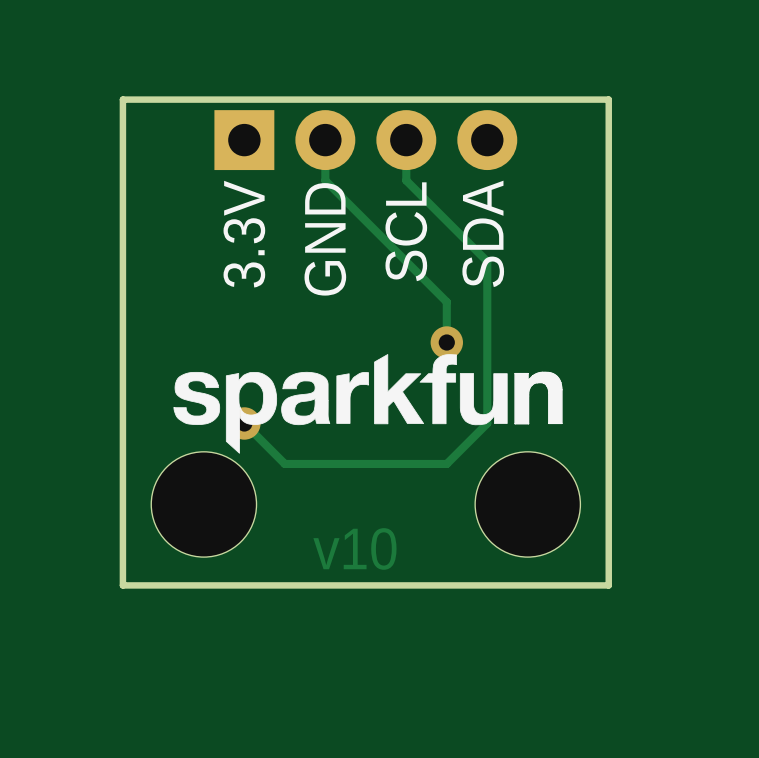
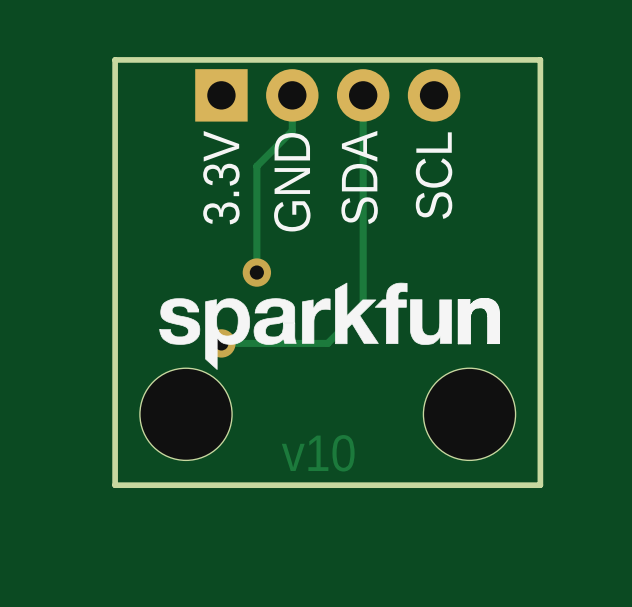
track: (325, 180) (446, 302) (446, 342) -> (292, 130) (256, 166) (256, 272)
track: (406, 180) (487, 261) (487, 423) (446, 463) (284, 463) (244, 423) -> (363, 130) (363, 307) (327, 343) (221, 343)
text position: SCL (406, 231) -> SCL (434, 175)
text position: SDA (483, 233) -> SDA (359, 177)
via position: (446, 342) -> (256, 272)

